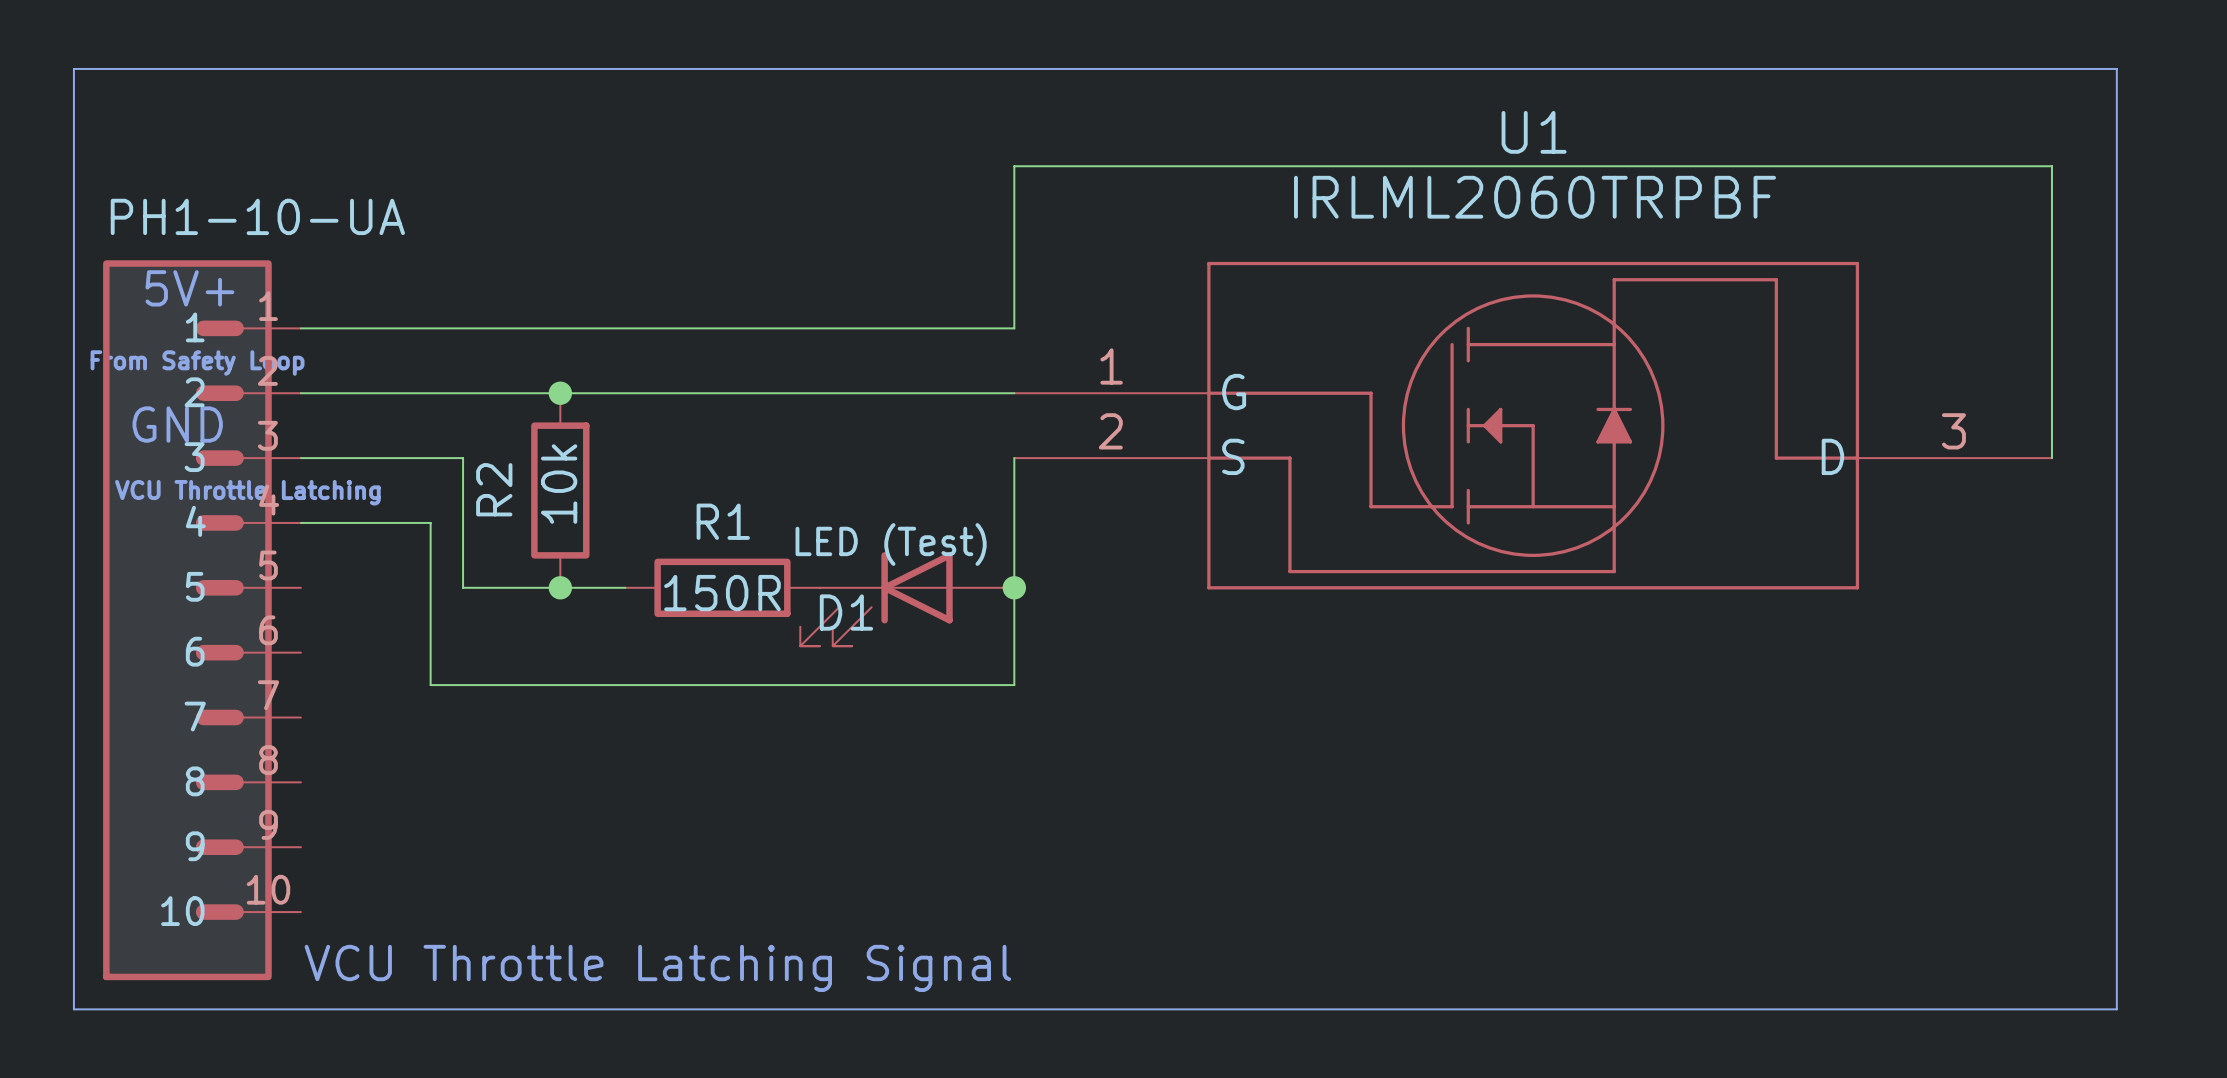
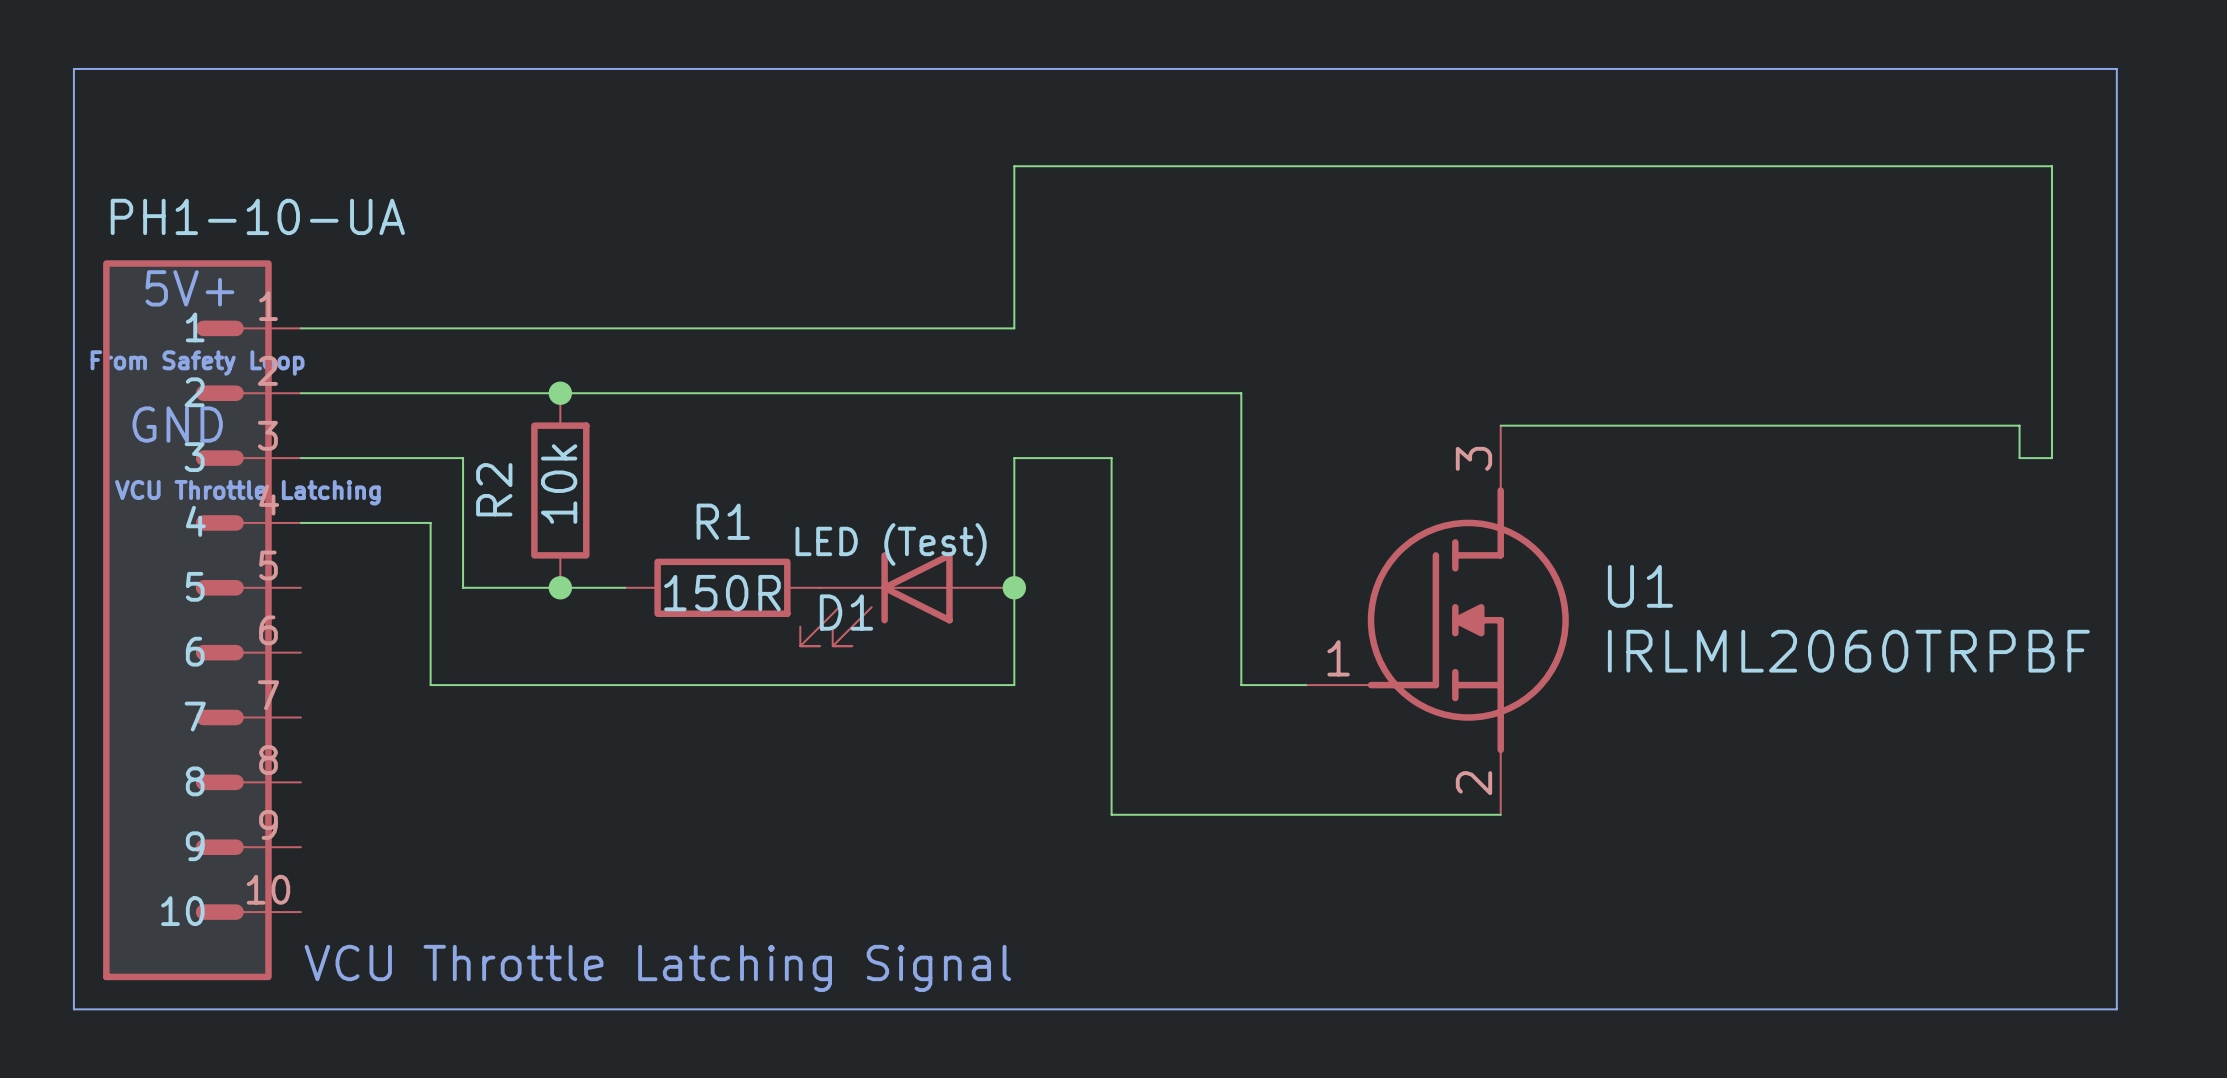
U1 name position: U1 (1534, 132) -> U1 (1640, 586)
U1 value position: IRLML2060TRPBF (1535, 197) -> IRLML2060TRPBF (1848, 651)
U1 symbol: [1014, 261, 2052, 590] -> [1306, 425, 1569, 815]
wire: none -> (1014, 393) (1241, 393) (1241, 685) (1306, 685)
wire: none -> (1500, 425) (2019, 425) (2019, 458) (2051, 458)
wire: none -> (1014, 458) (1111, 458) (1111, 814) (1500, 814)

